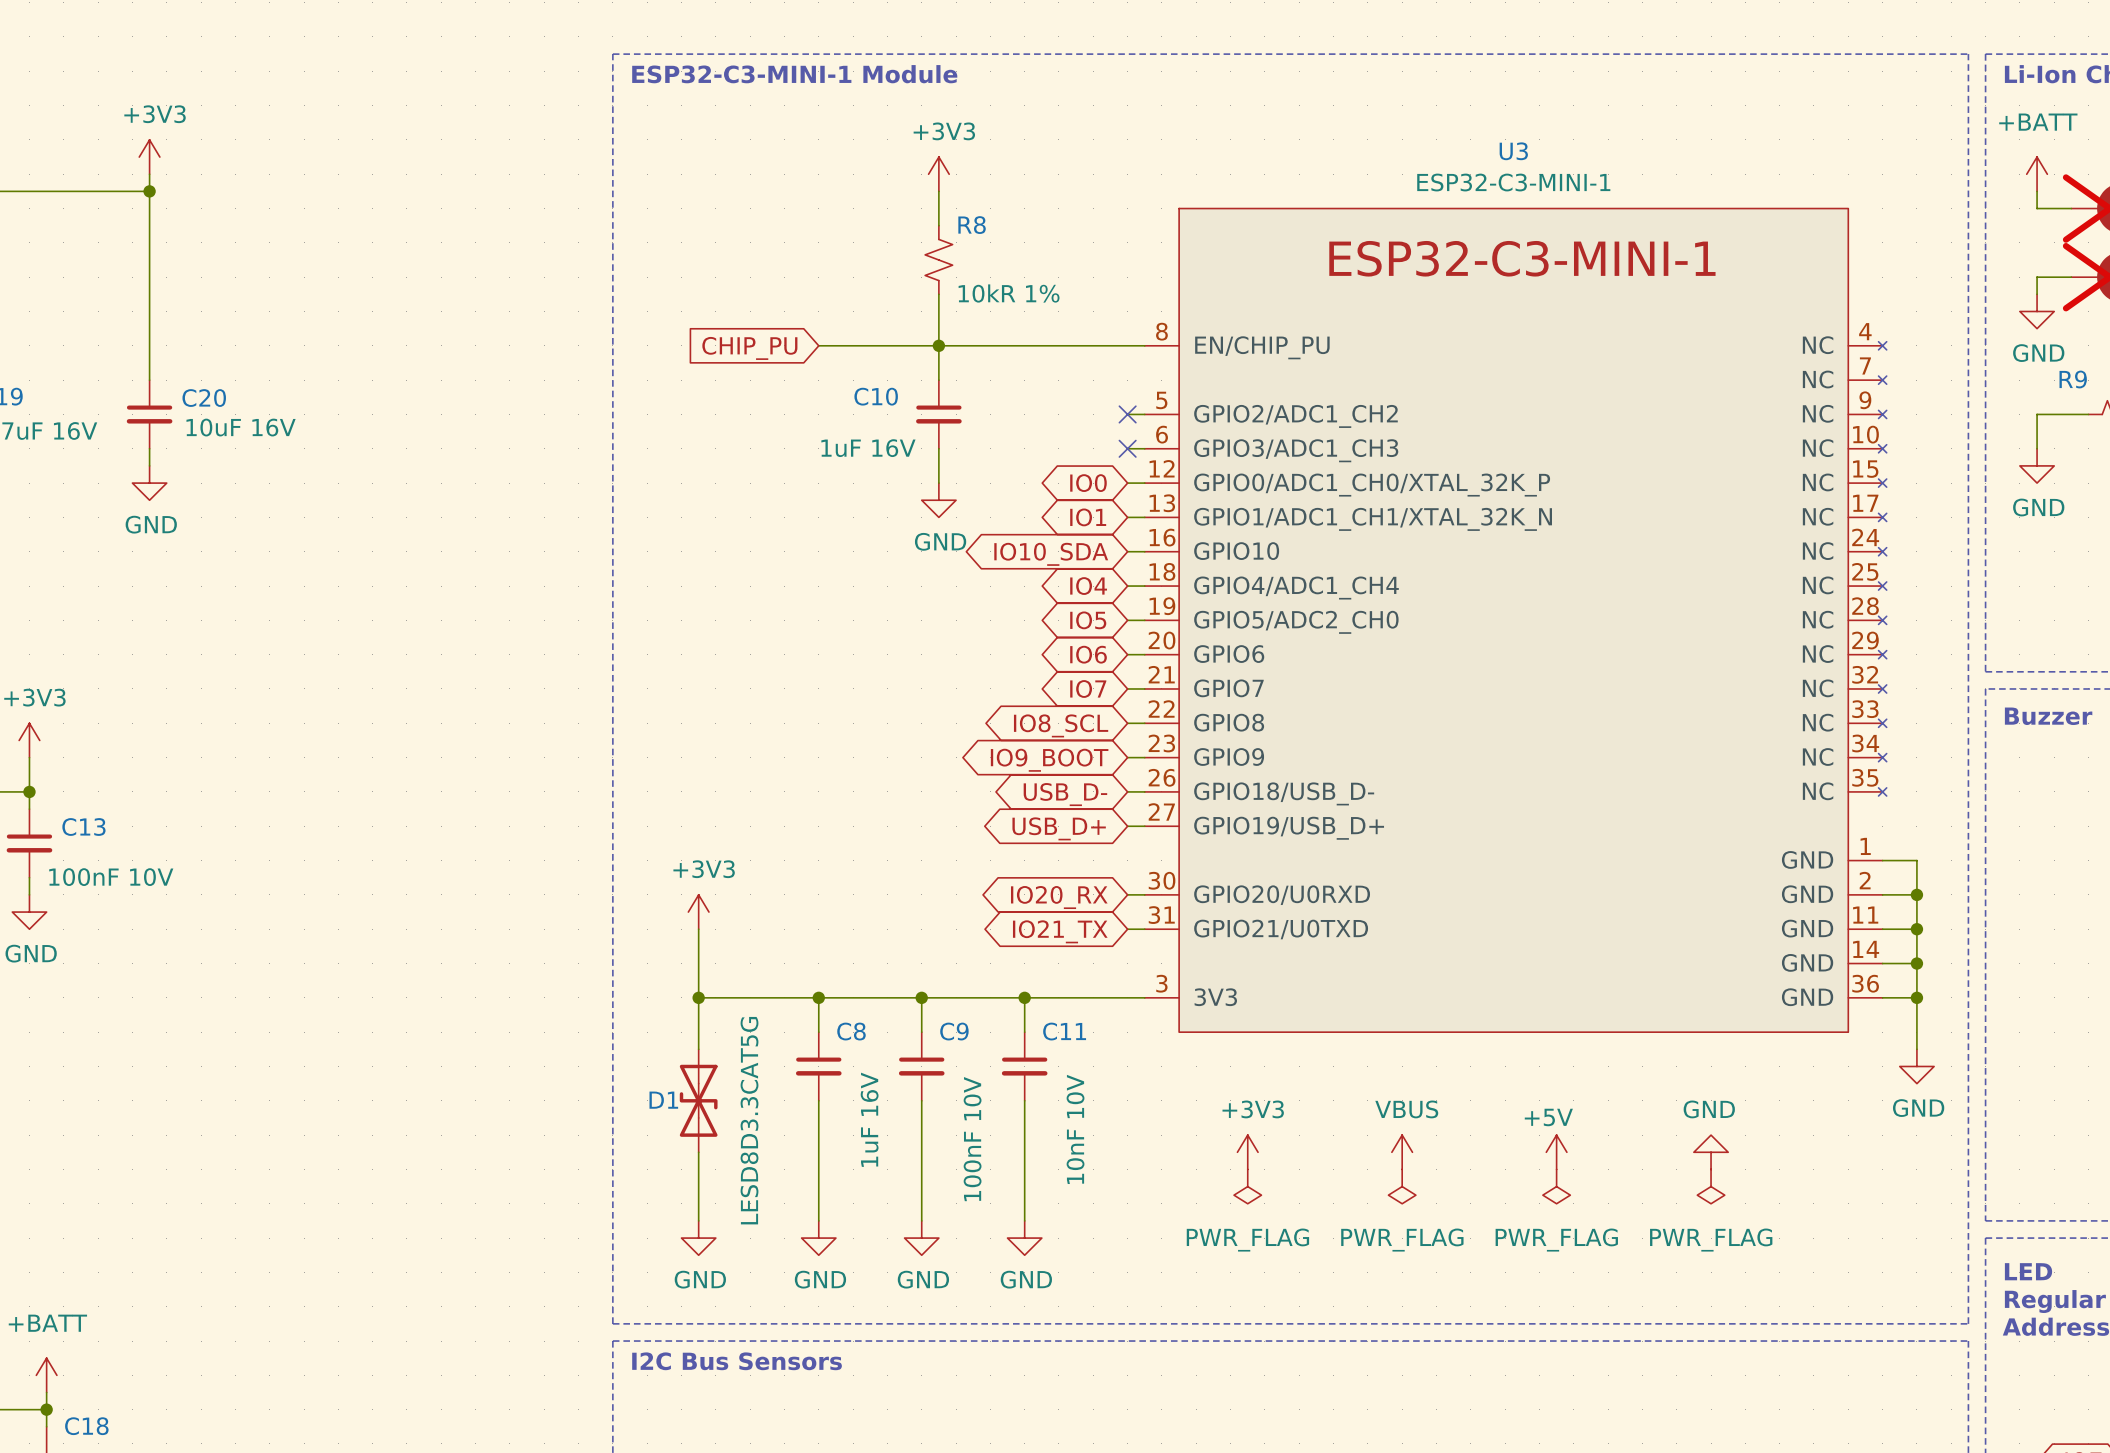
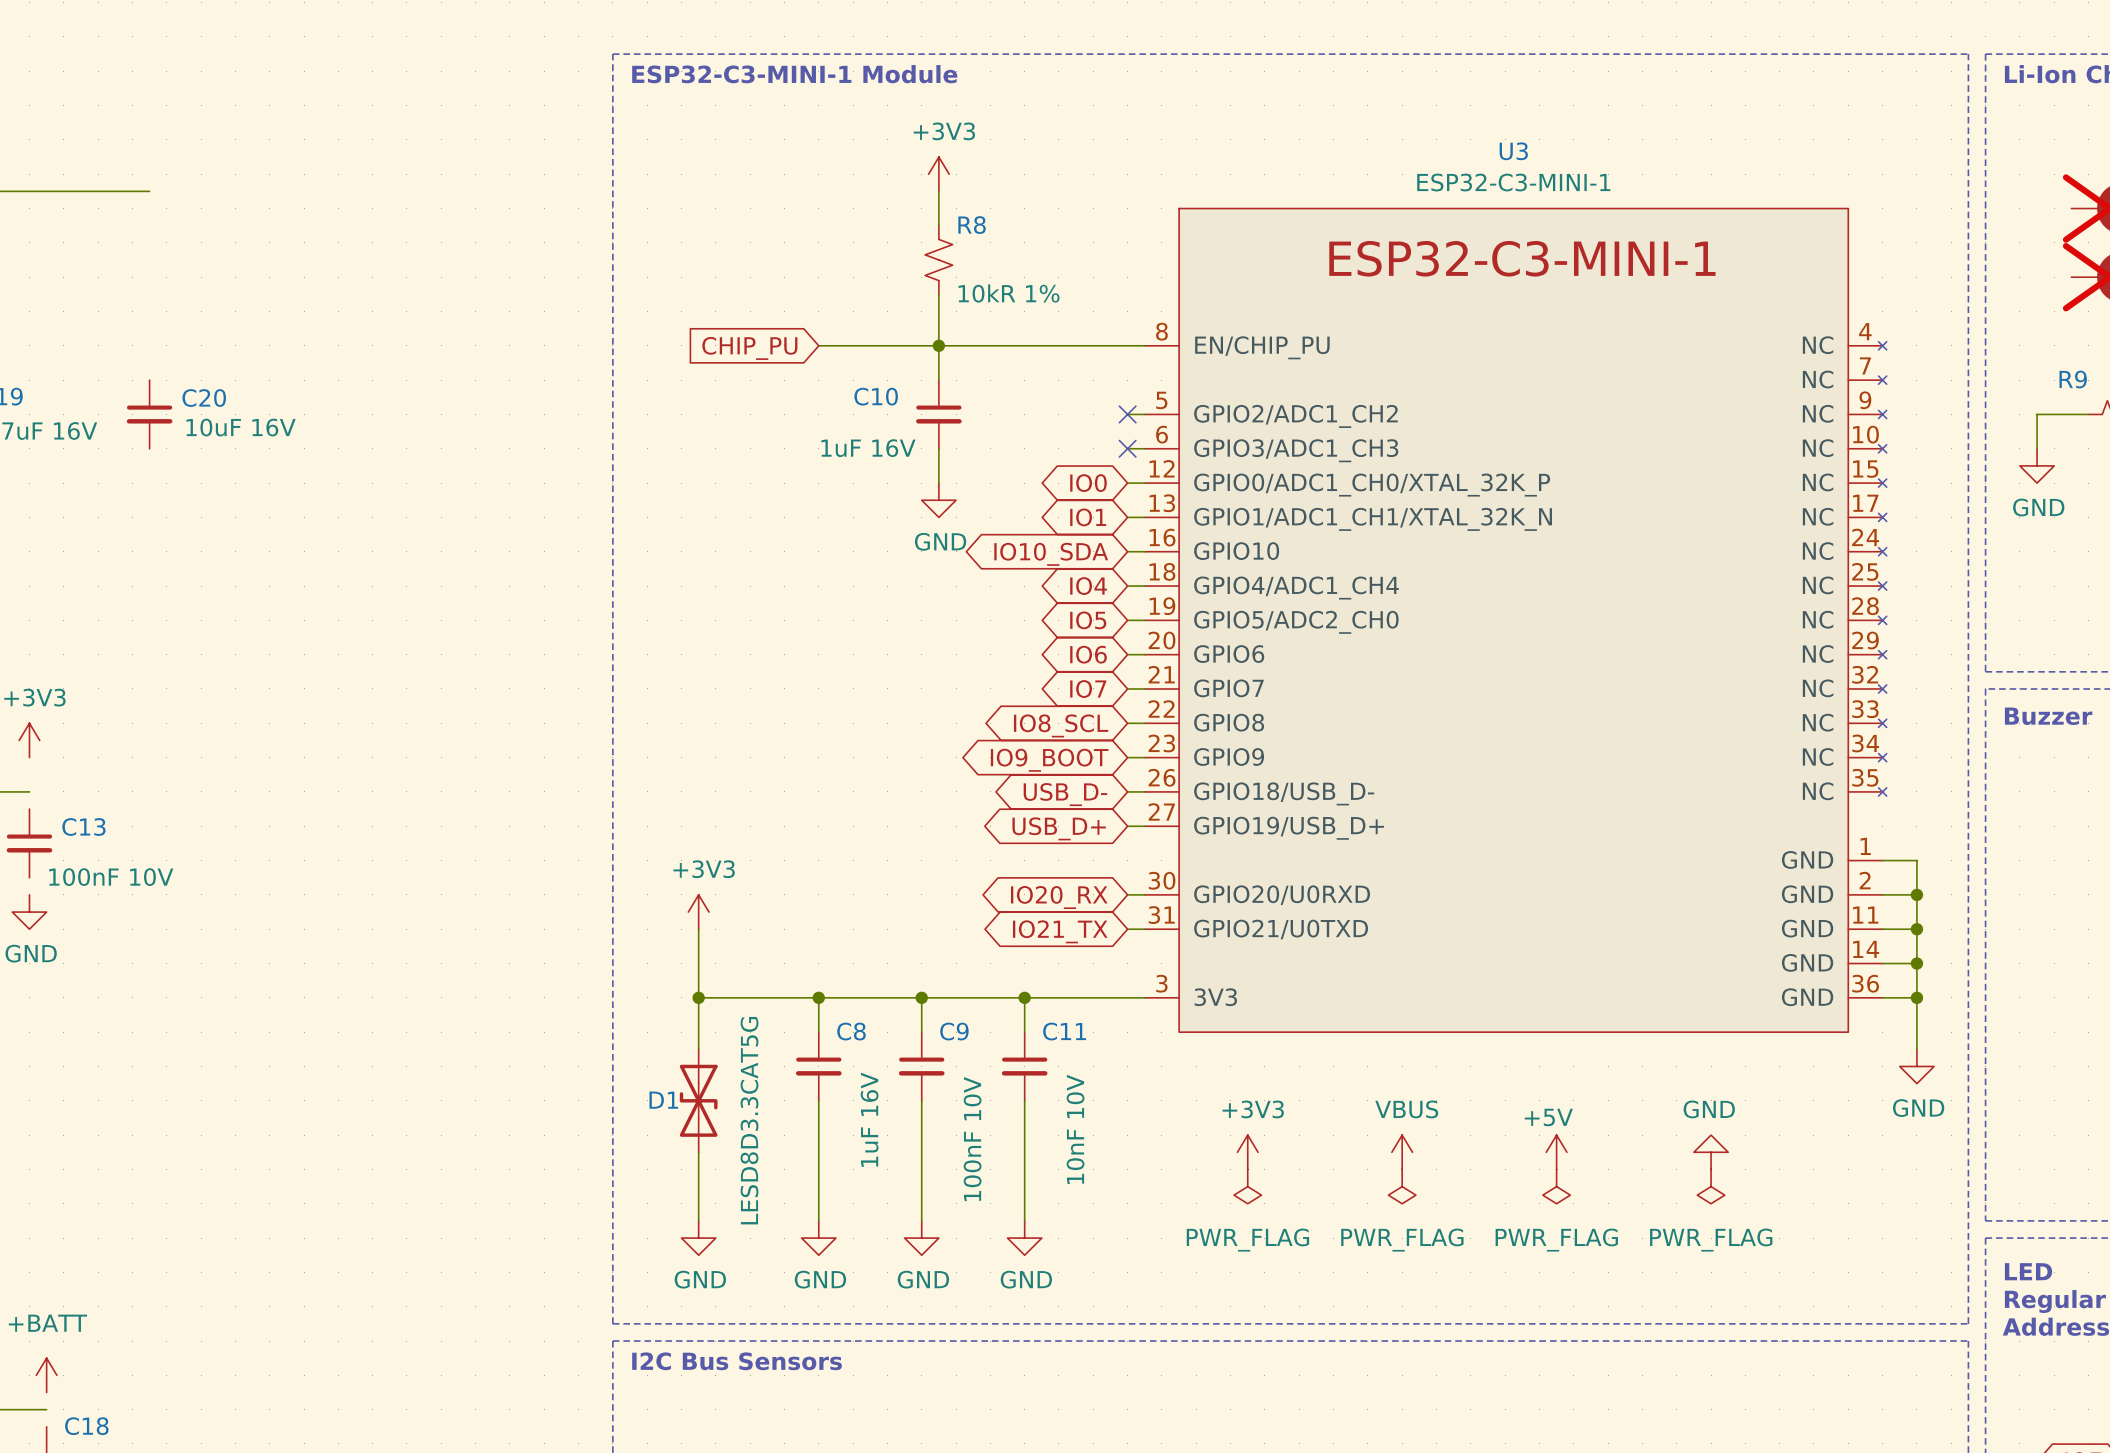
power symbol: +3V3 (149, 157) -> none
wire: (149, 174) (149, 380) -> none
power symbol: +BATT (2037, 174) -> none
junction: (149, 191) -> none
wire: (2037, 191) (2037, 208) (2071, 208) -> none
wire: (2071, 277) (2037, 277) (2037, 294) -> none
power symbol: GND (2037, 311) -> none
wire: (149, 448) (149, 465) -> none
power symbol: GND (149, 483) -> none
wire: (29, 757) (29, 809) -> none
junction: (29, 791) -> none
wire: (29, 877) (29, 894) -> none
wire: (46, 1392) (46, 1426) -> none
junction: (46, 1409) -> none

